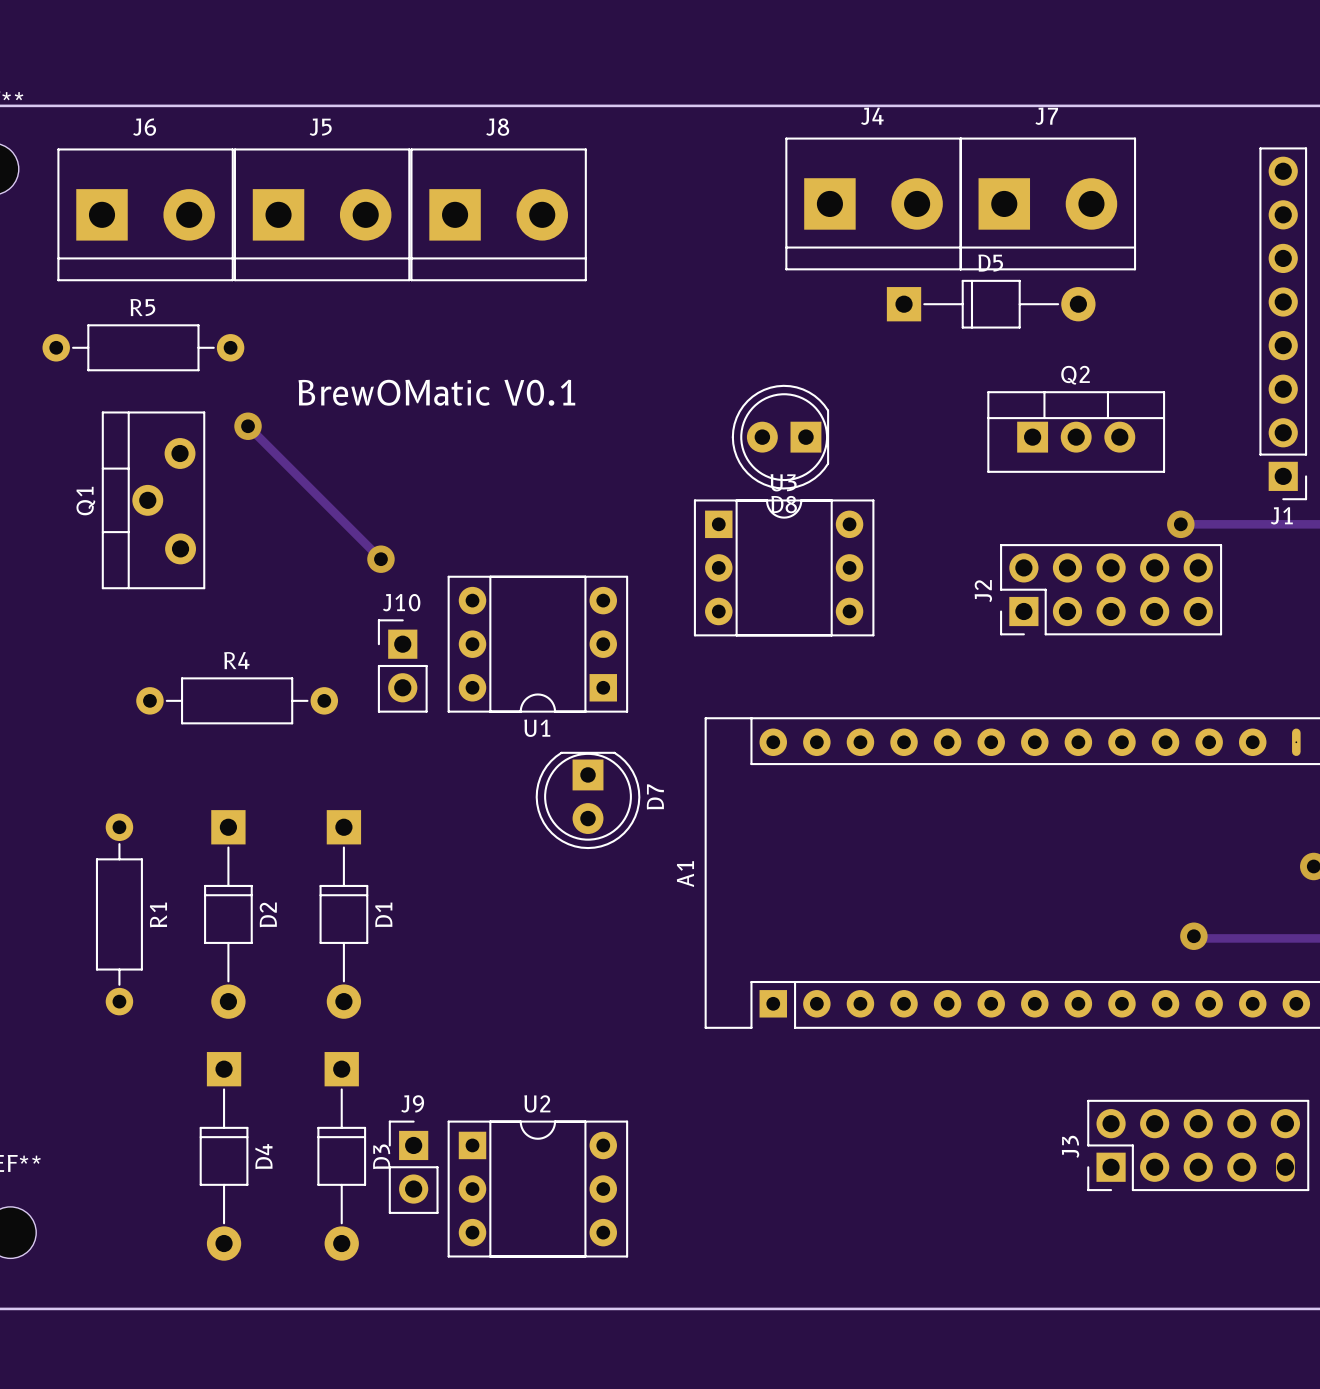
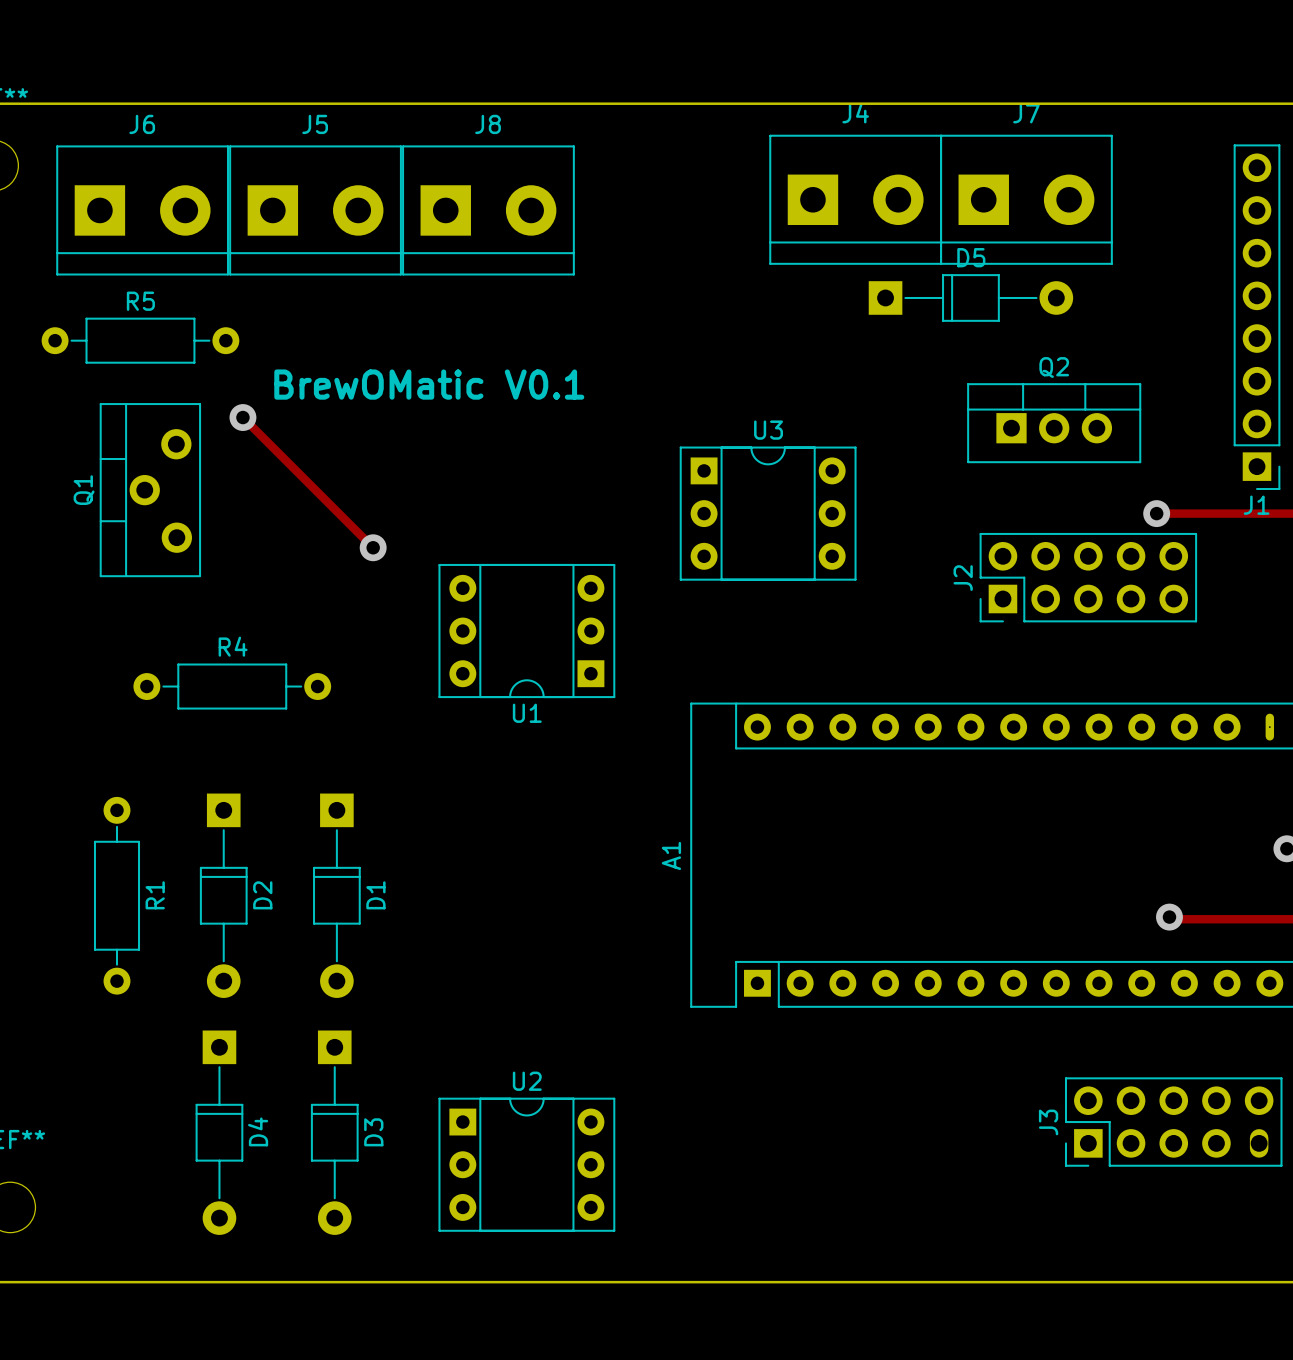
D8: (780, 437) -> none
U3 position: (784, 567) -> (768, 513)
J10: (402, 665) -> none
D7: (588, 800) -> none
J9: (413, 1167) -> none

